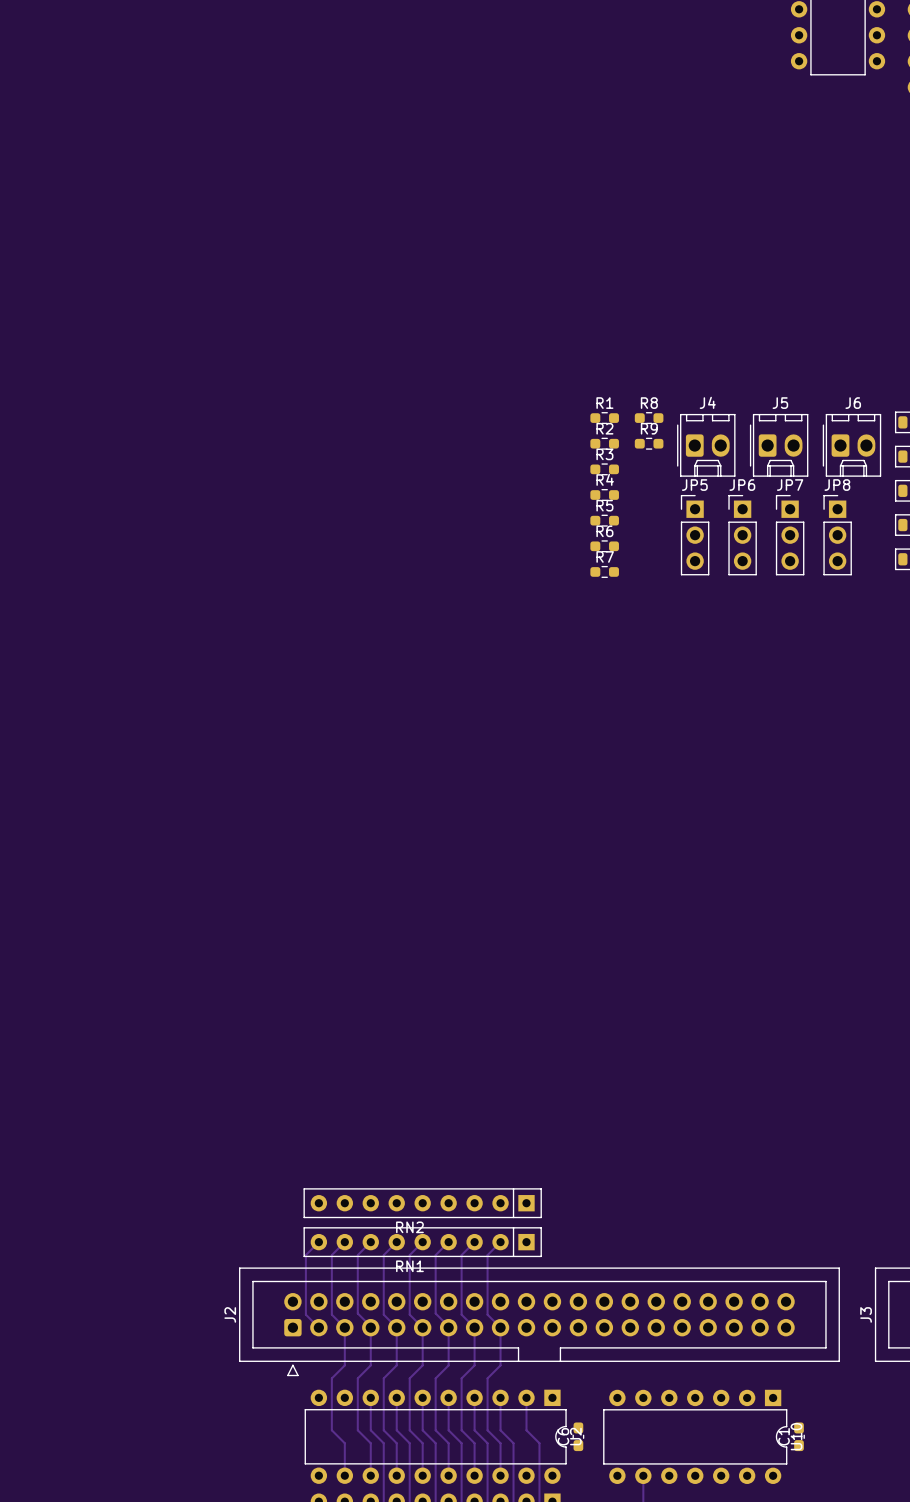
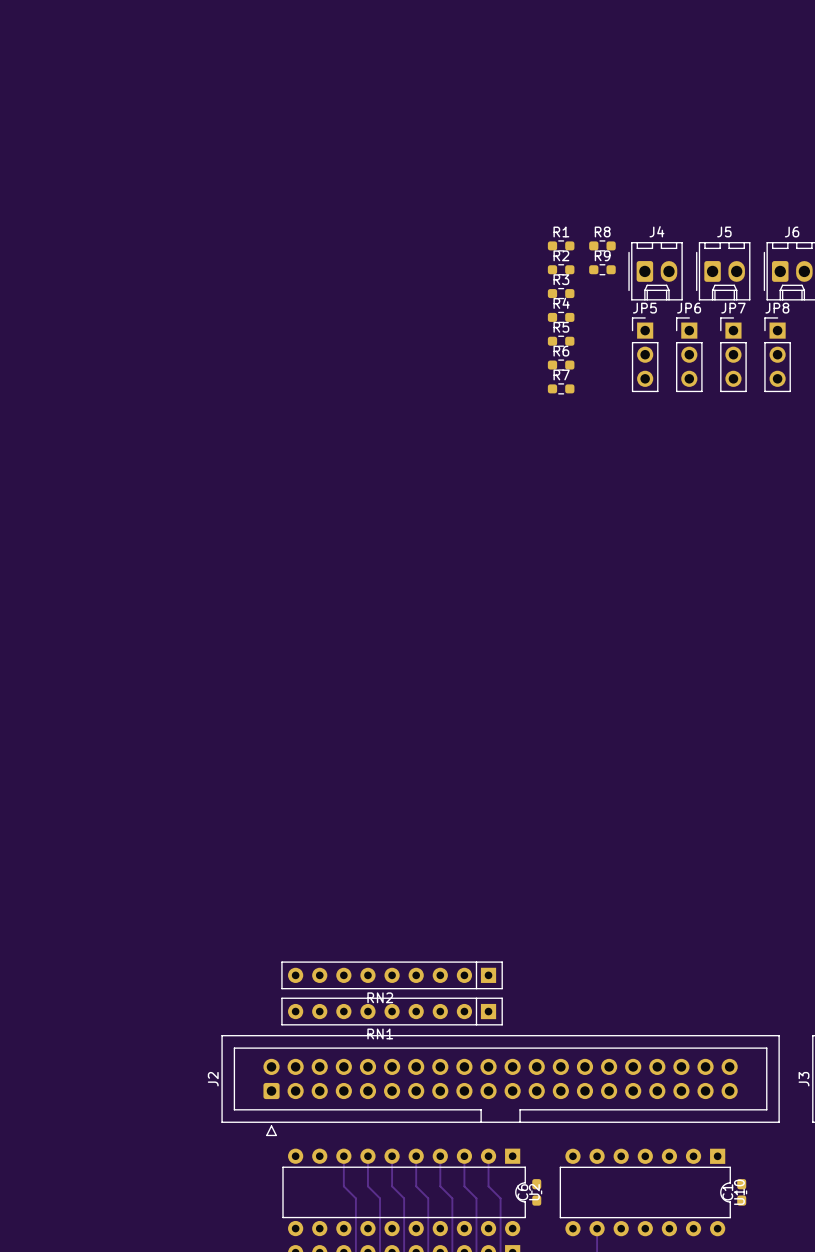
track: (318, 1242) (305, 1255) (305, 1314) (318, 1327) -> none
track: (344, 1242) (331, 1255) (331, 1314) (344, 1327) (344, 1365) (331, 1378) (331, 1430) (344, 1443) (344, 1475) -> none
track: (370, 1242) (357, 1255) (357, 1313) (370, 1326) (370, 1365) (357, 1378) (357, 1430) (370, 1443) (370, 1475) -> none
track: (396, 1242) (383, 1255) (383, 1314) (396, 1327) (396, 1365) (383, 1378) (383, 1430) (396, 1443) (396, 1475) -> none
track: (422, 1242) (409, 1255) (409, 1314) (422, 1327) (422, 1365) (409, 1378) (409, 1430) (422, 1443) (422, 1475) -> none
track: (448, 1242) (435, 1255) (435, 1313) (448, 1326) (448, 1365) (435, 1378) (435, 1430) (448, 1443) (448, 1475) -> none
track: (474, 1242) (461, 1255) (461, 1314) (474, 1327) (474, 1365) (461, 1378) (461, 1430) (474, 1443) (474, 1475) -> none
track: (500, 1242) (487, 1255) (487, 1314) (500, 1327) (500, 1365) (487, 1378) (487, 1430) (500, 1443) (500, 1475) -> none

